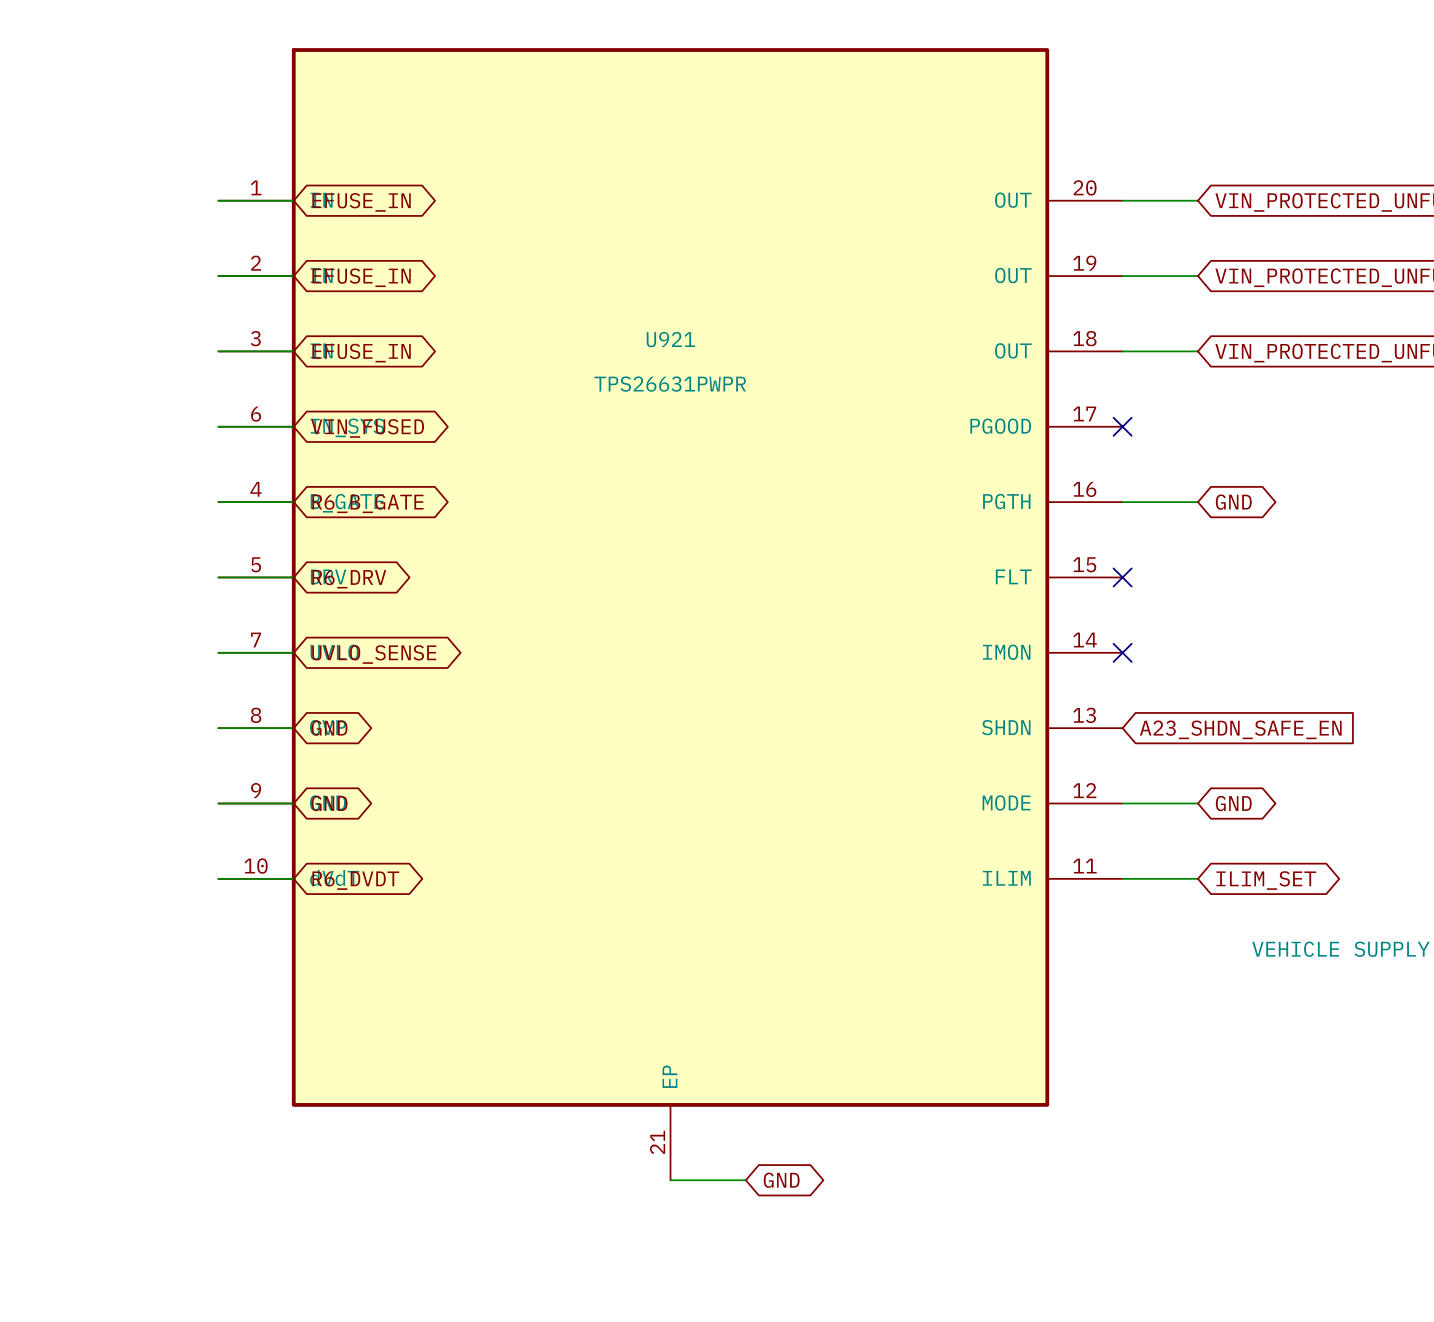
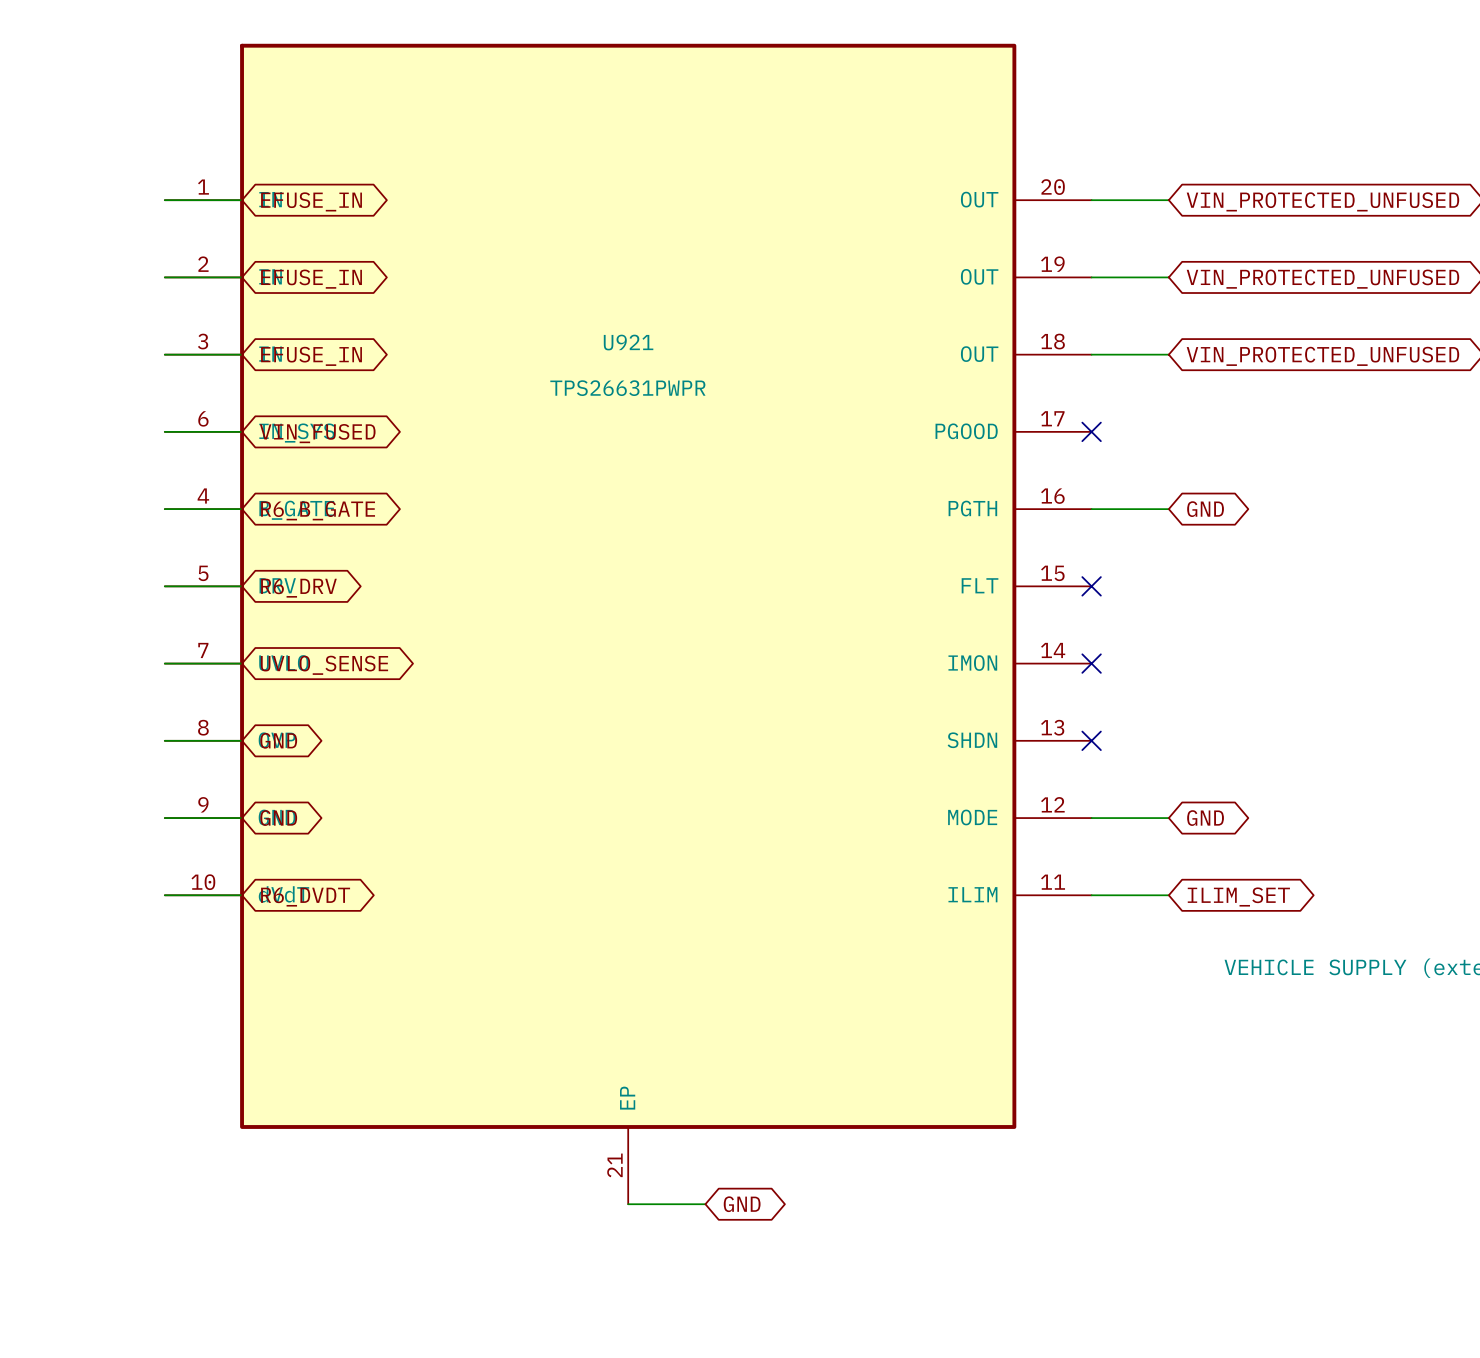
no-connect mark: none -> (1091, 740)
global label: A23_SHDN_SAFE_EN (1240, 729) -> none

